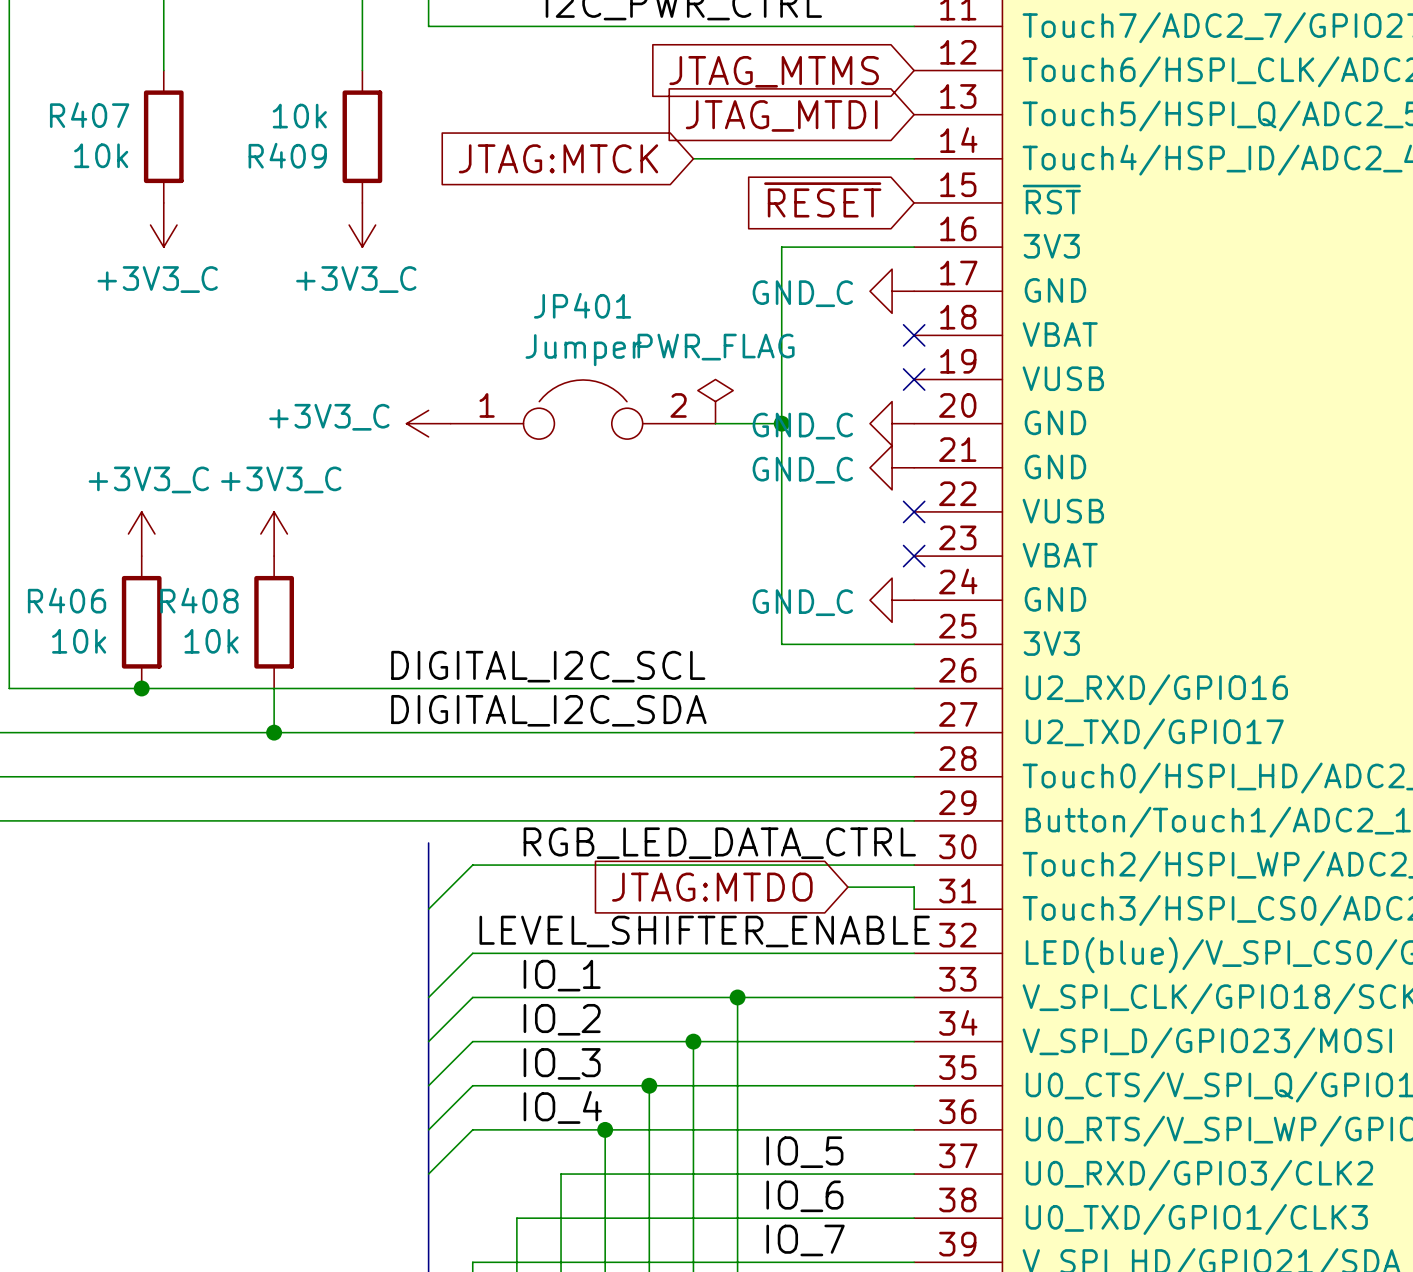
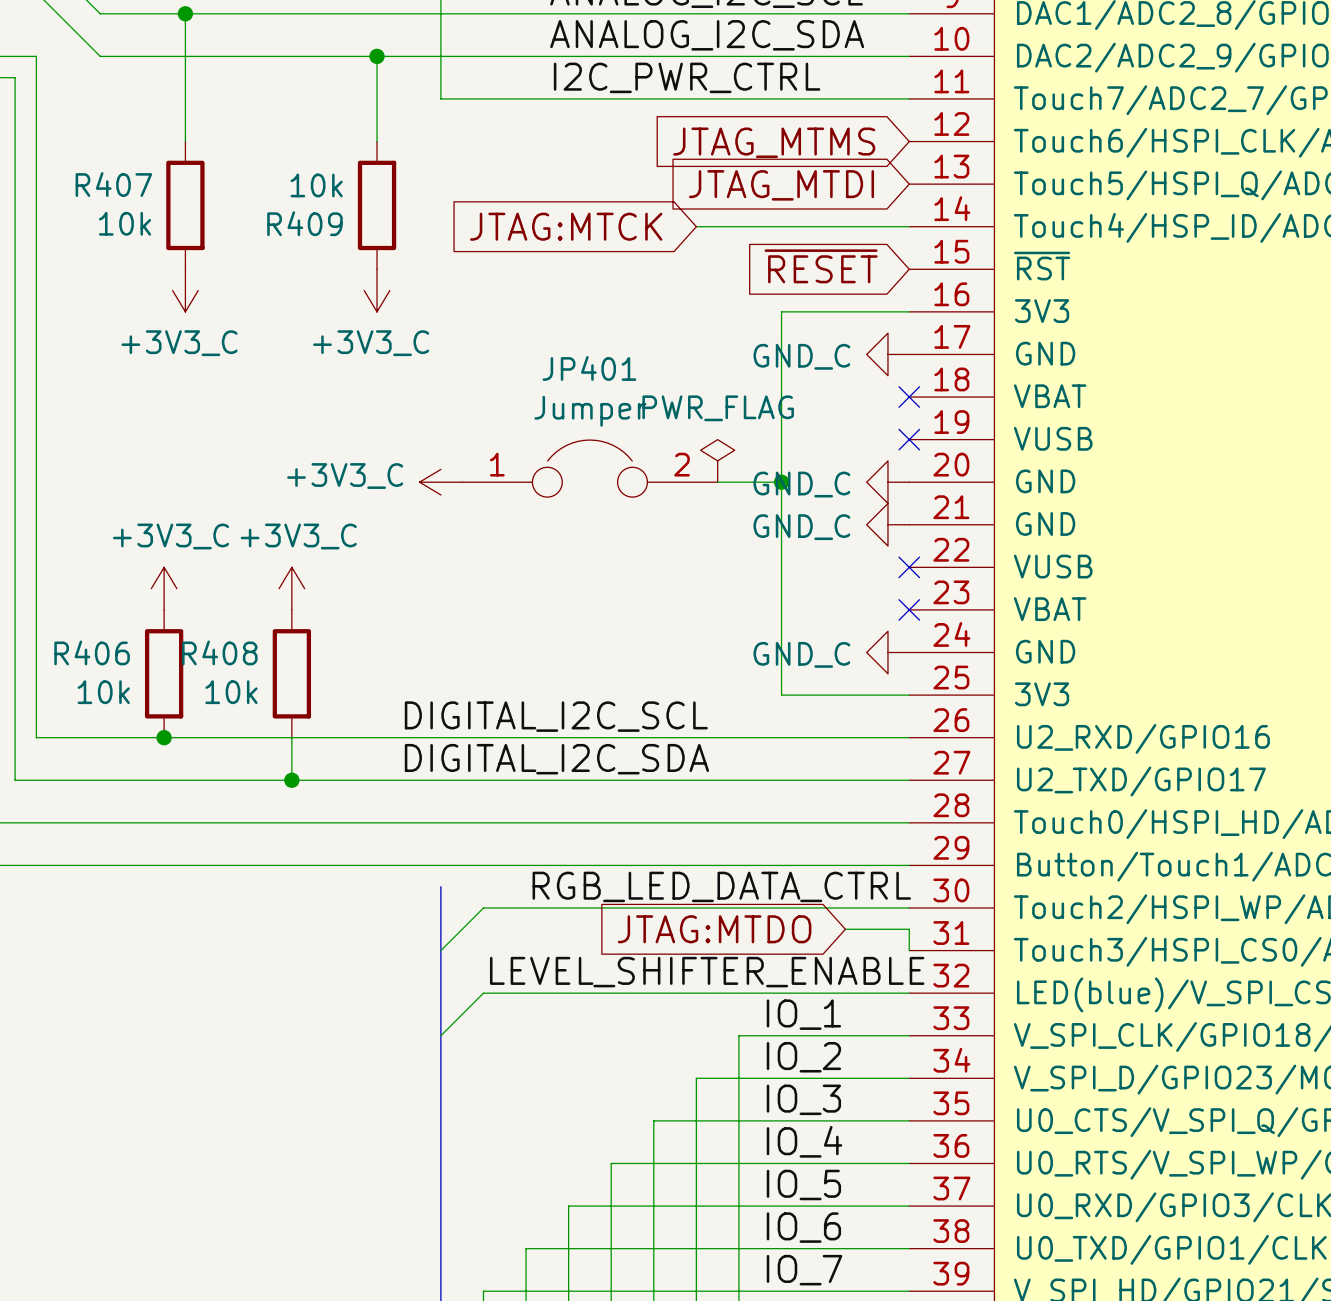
label position: IO_1 (562, 975) -> IO_1 (803, 1014)
wire: (737, 997) (472, 997) (428, 1041) -> none
junction: (737, 997) -> none
label position: IO_2 (562, 1019) -> IO_2 (803, 1057)
wire: (693, 1041) (472, 1041) (428, 1085) -> none
junction: (693, 1041) -> none
label position: IO_3 (562, 1063) -> IO_3 (803, 1099)
wire: (649, 1085) (472, 1085) (428, 1129) -> none
junction: (649, 1085) -> none
label position: IO_4 (562, 1107) -> IO_4 (804, 1141)
wire: (605, 1129) (472, 1129) (428, 1174) -> none
junction: (605, 1129) -> none

